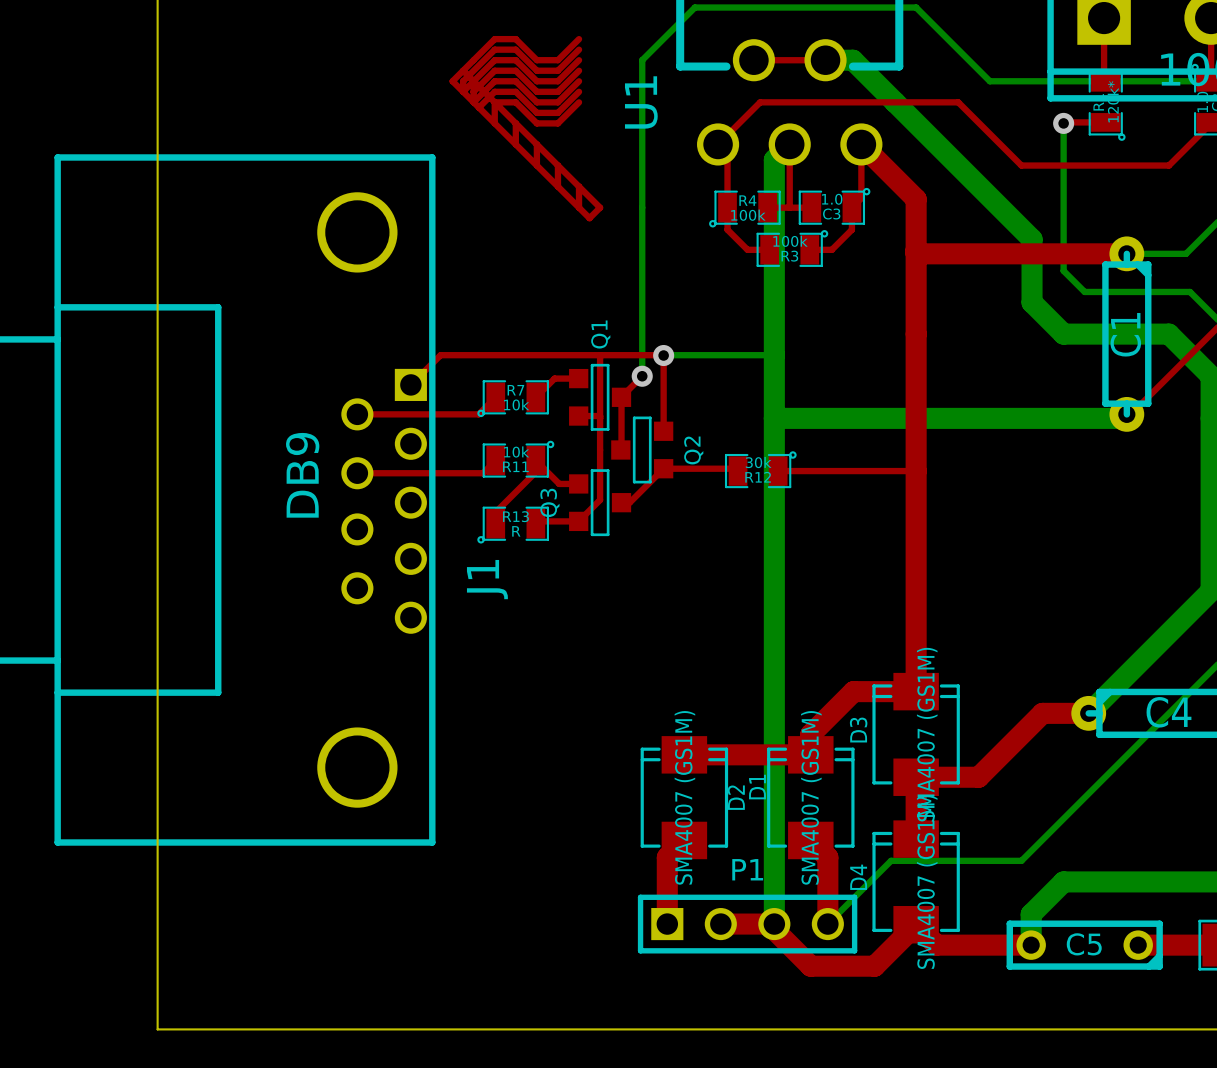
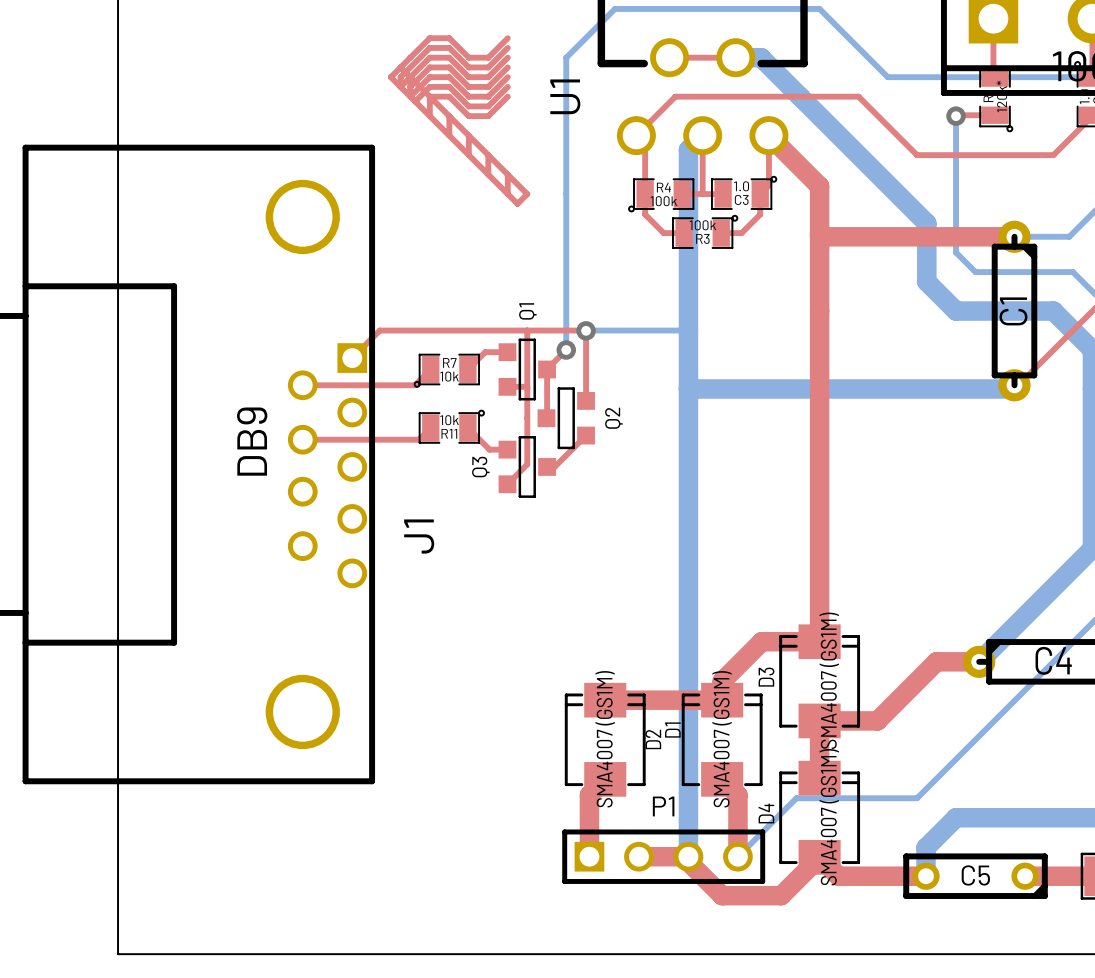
top track: (535, 460) (535, 472) (495, 512) (495, 523) -> none
top track: (663, 468) (735, 468) (738, 471) -> none
R12: 30k (760, 469) -> none
top track: (778, 471) (916, 471) -> none
top track: (578, 521) (538, 521) (535, 523) -> none
R13: R (513, 525) -> none

